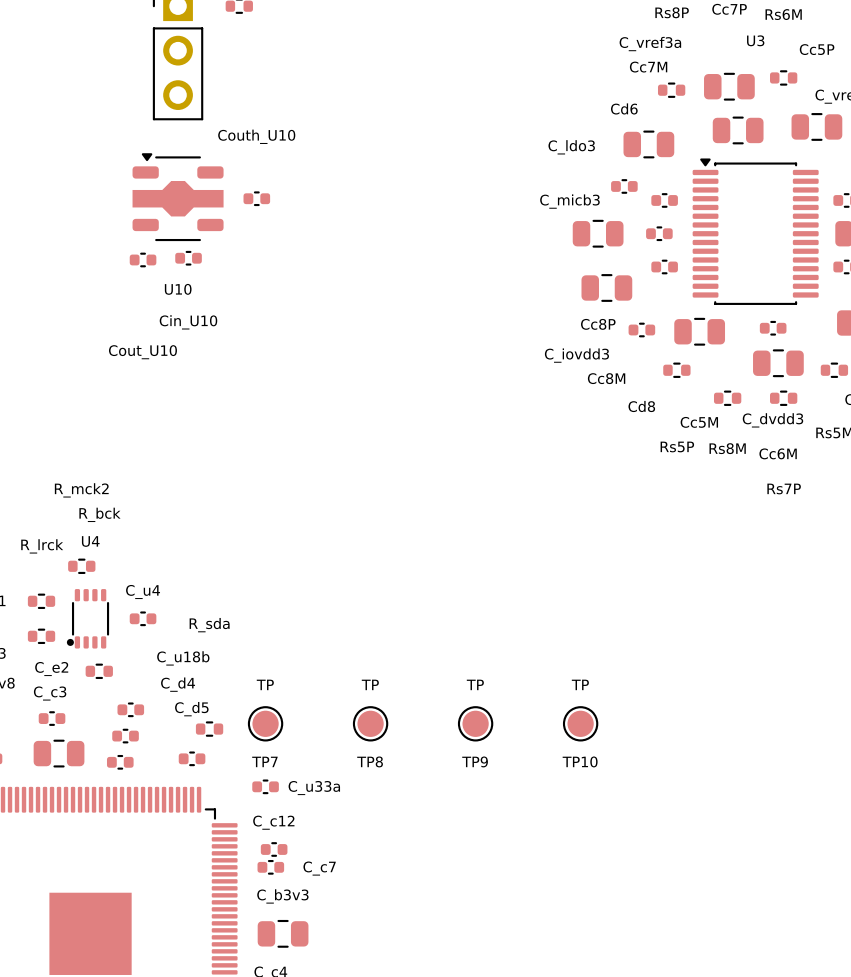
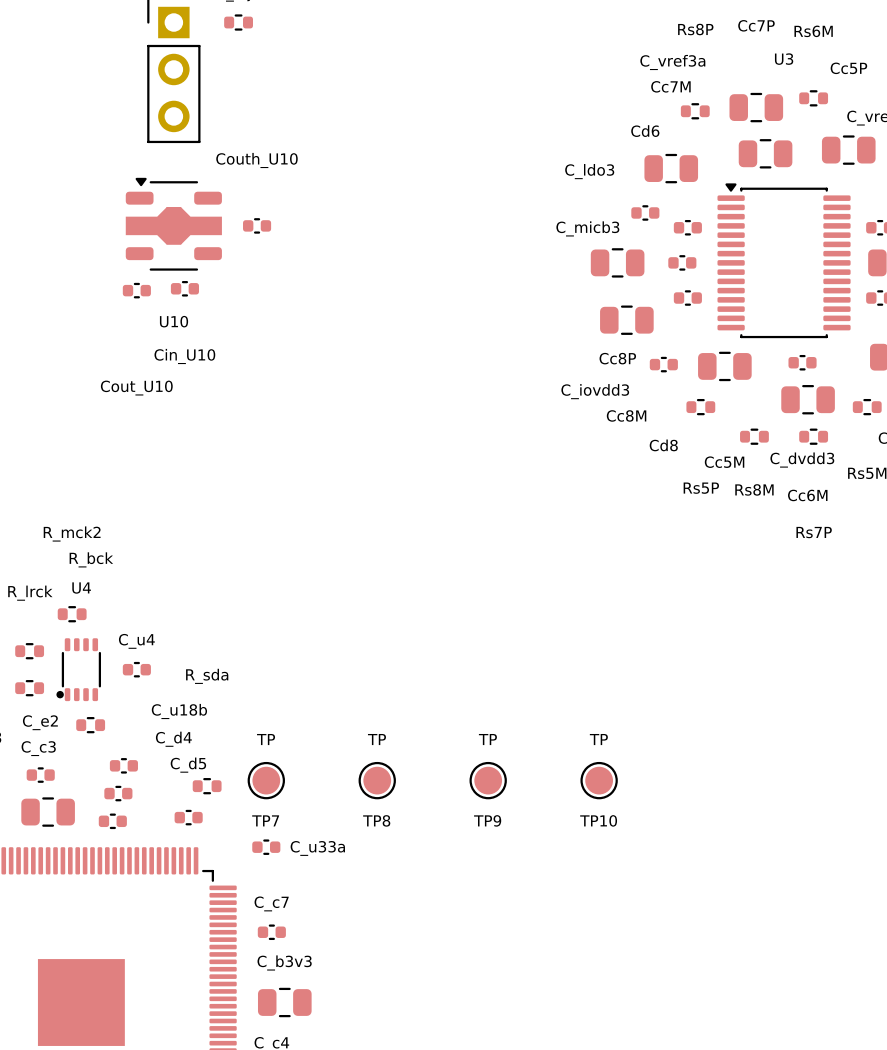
C_c12: (274, 849) -> none
C_c7 name position: C_c7 (319, 868) -> C_c7 (271, 903)

